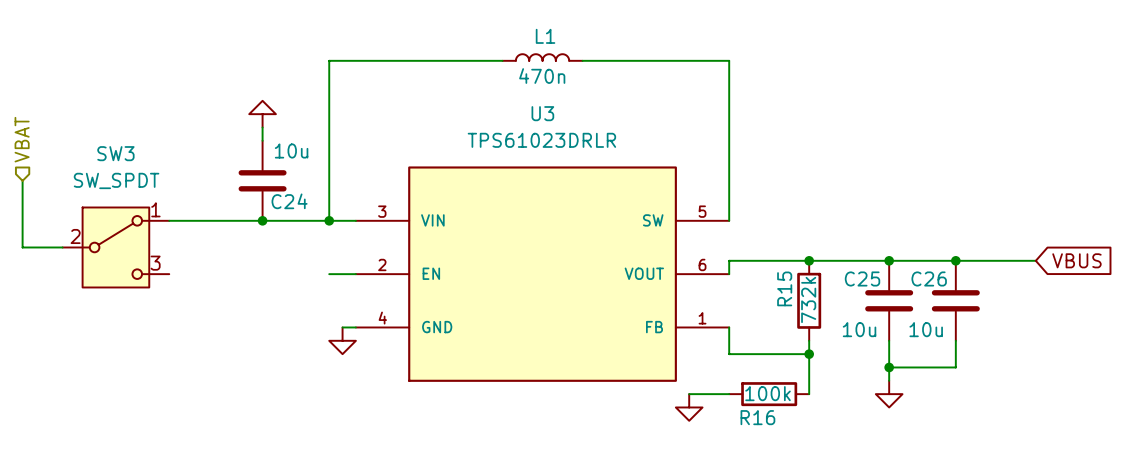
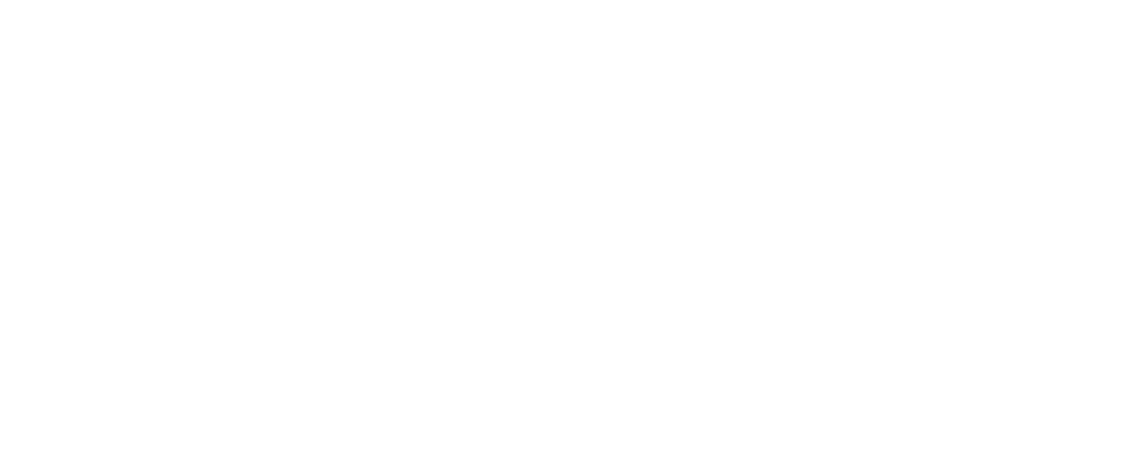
L1: 470n (542, 57) -> none
wire: (502, 60) (329, 60) (329, 220) -> none
wire: (582, 60) (729, 60) (729, 220) -> none
power symbol: (262, 114) -> none
wire: (262, 127) (262, 140) -> none
hierarchical label: VBAT (22, 139) -> none
wire: (22, 180) (22, 247) (62, 247) -> none
C24: 10u (262, 180) -> none
wire: (169, 220) (355, 220) -> none
junction: (262, 220) -> none
junction: (329, 220) -> none
SW3: SW_SPDT (115, 247) -> none
junction: (809, 260) -> none
junction: (889, 260) -> none
junction: (955, 260) -> none
wire: (1035, 260) (729, 260) (729, 274) -> none
global label: VBUS (1076, 260) -> none
wire: (329, 274) (355, 274) -> none
U3: TPS61023DRLR (542, 274) -> none
R15: 732k (809, 300) -> none
C25: 10u (889, 300) -> none
C26: 10u (955, 300) -> none
wire: (342, 327) (355, 327) -> none
wire: (729, 327) (729, 354) (809, 354) -> none
power symbol: (342, 340) -> none
wire: (809, 340) (809, 394) -> none
wire: (889, 340) (889, 380) -> none
wire: (955, 340) (955, 367) (889, 367) -> none
junction: (809, 354) -> none
junction: (889, 367) -> none
wire: (689, 394) (729, 394) -> none
R16: 100k (769, 394) -> none
power symbol: (889, 394) -> none
power symbol: (689, 407) -> none

